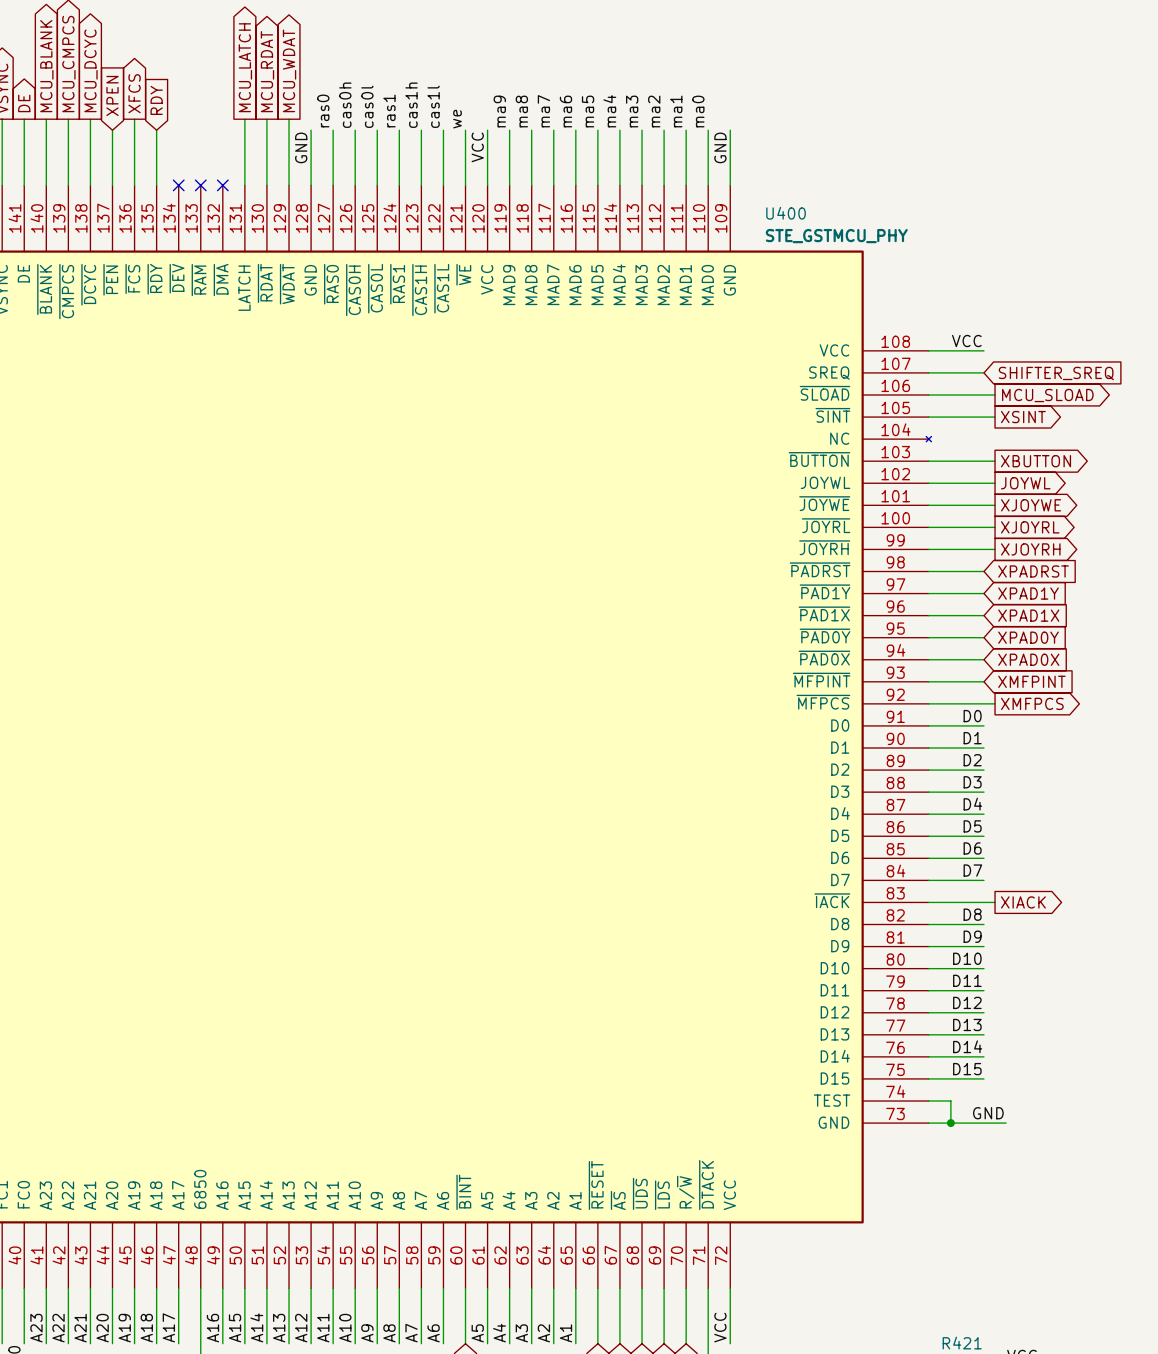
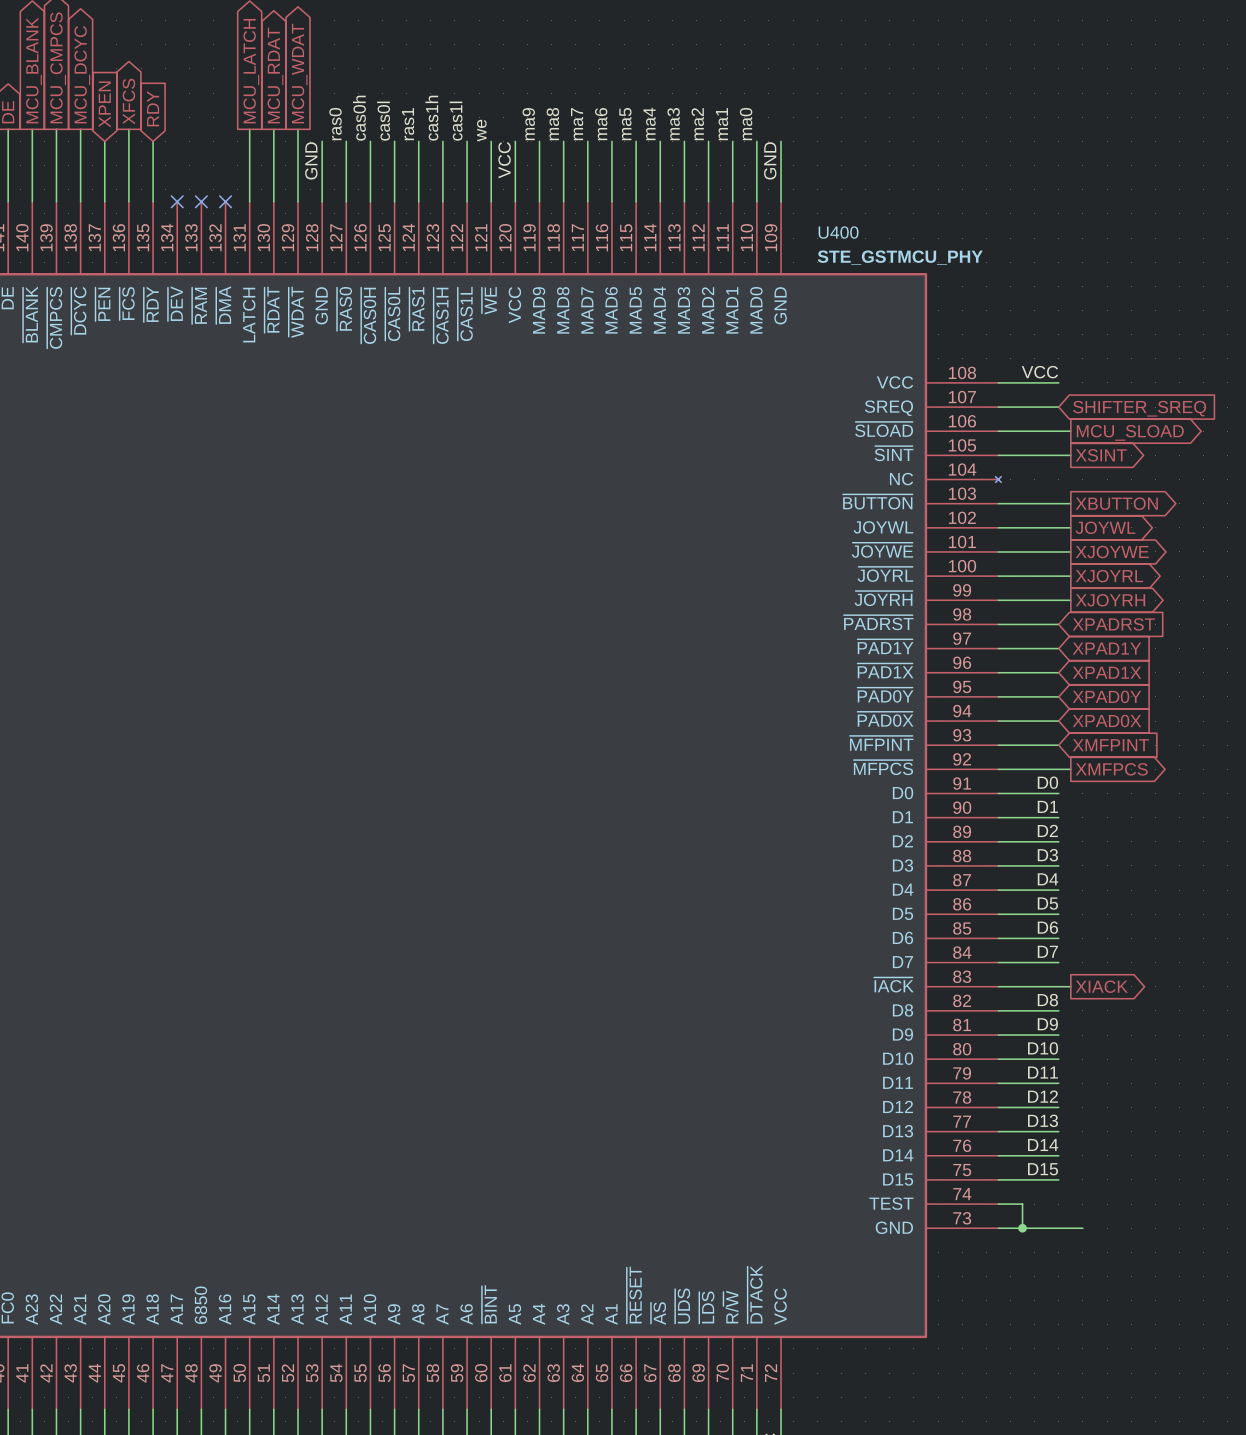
label: GND (988, 1113) -> none

